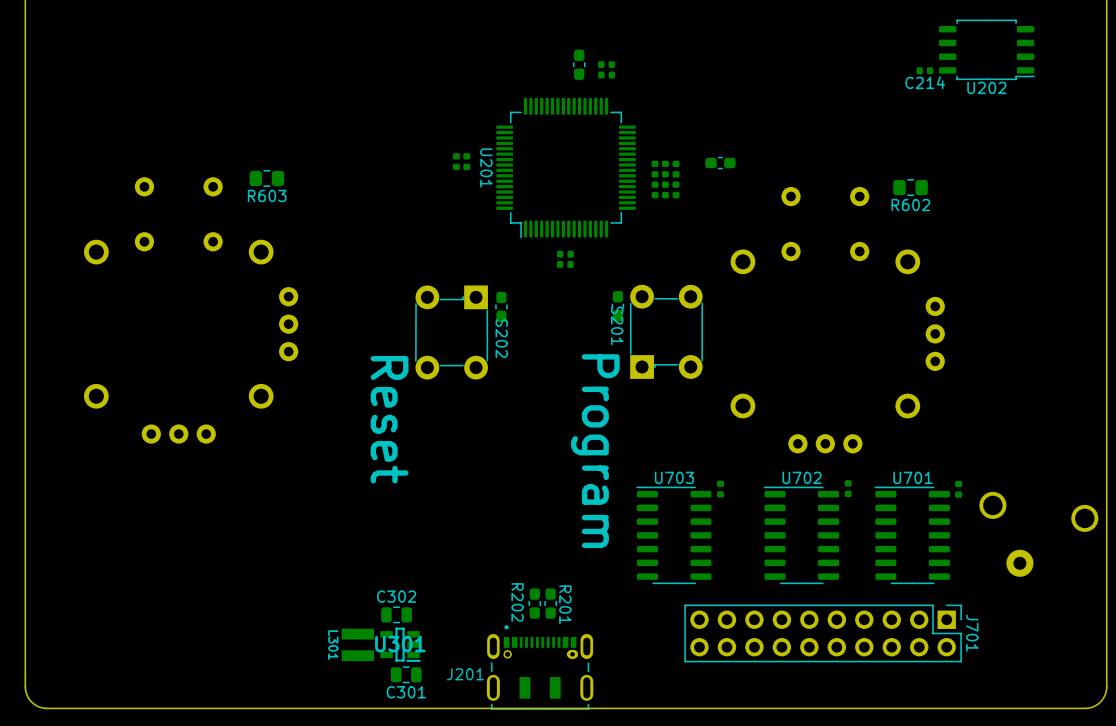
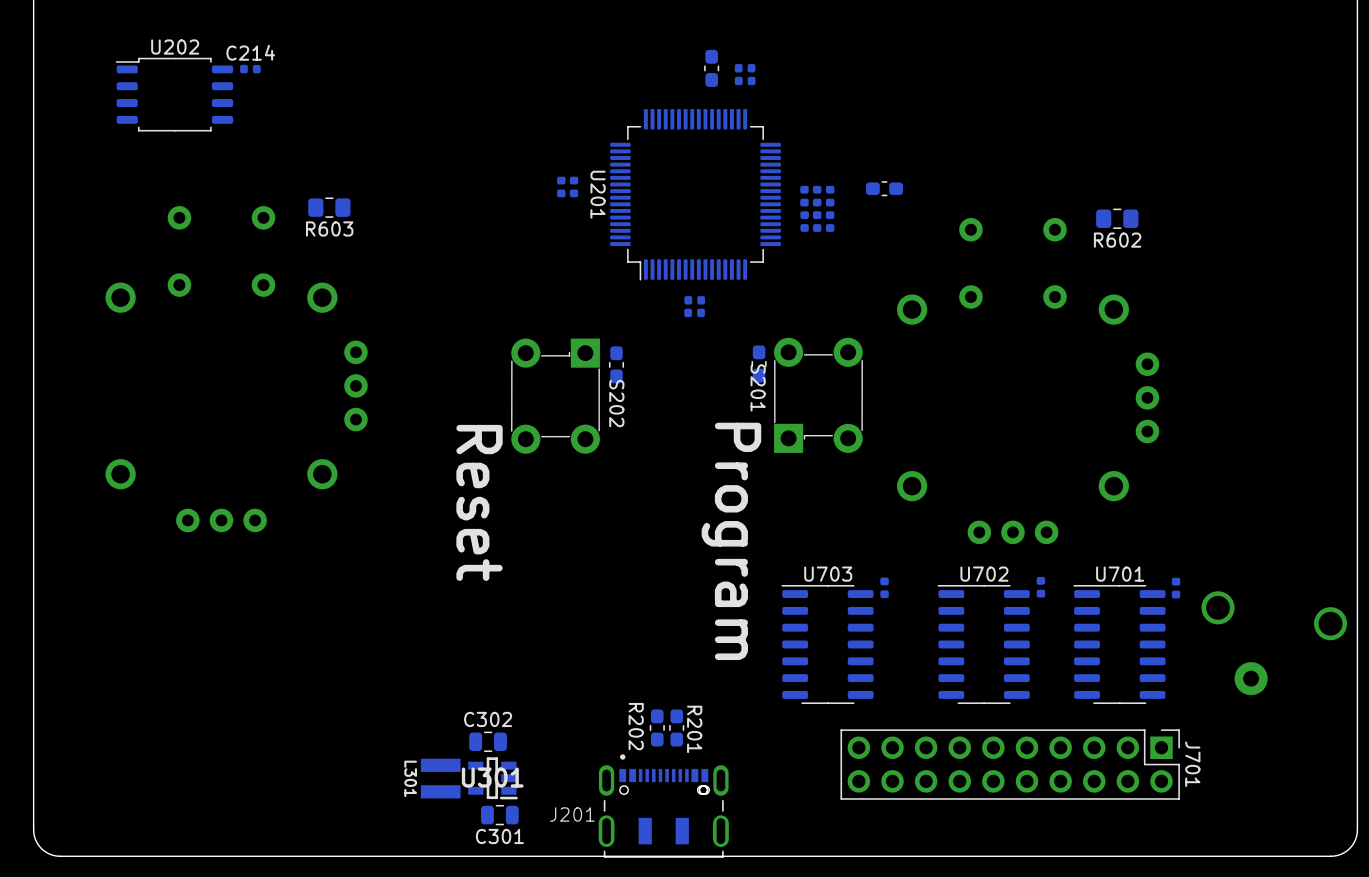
U202 rotation: 0° (986, 49) -> 180° (174, 94)
U202 position: (986, 49) -> (174, 94)
C214 position: (924, 70) -> (250, 69)
C214 name position: C214 (925, 82) -> C214 (250, 52)

